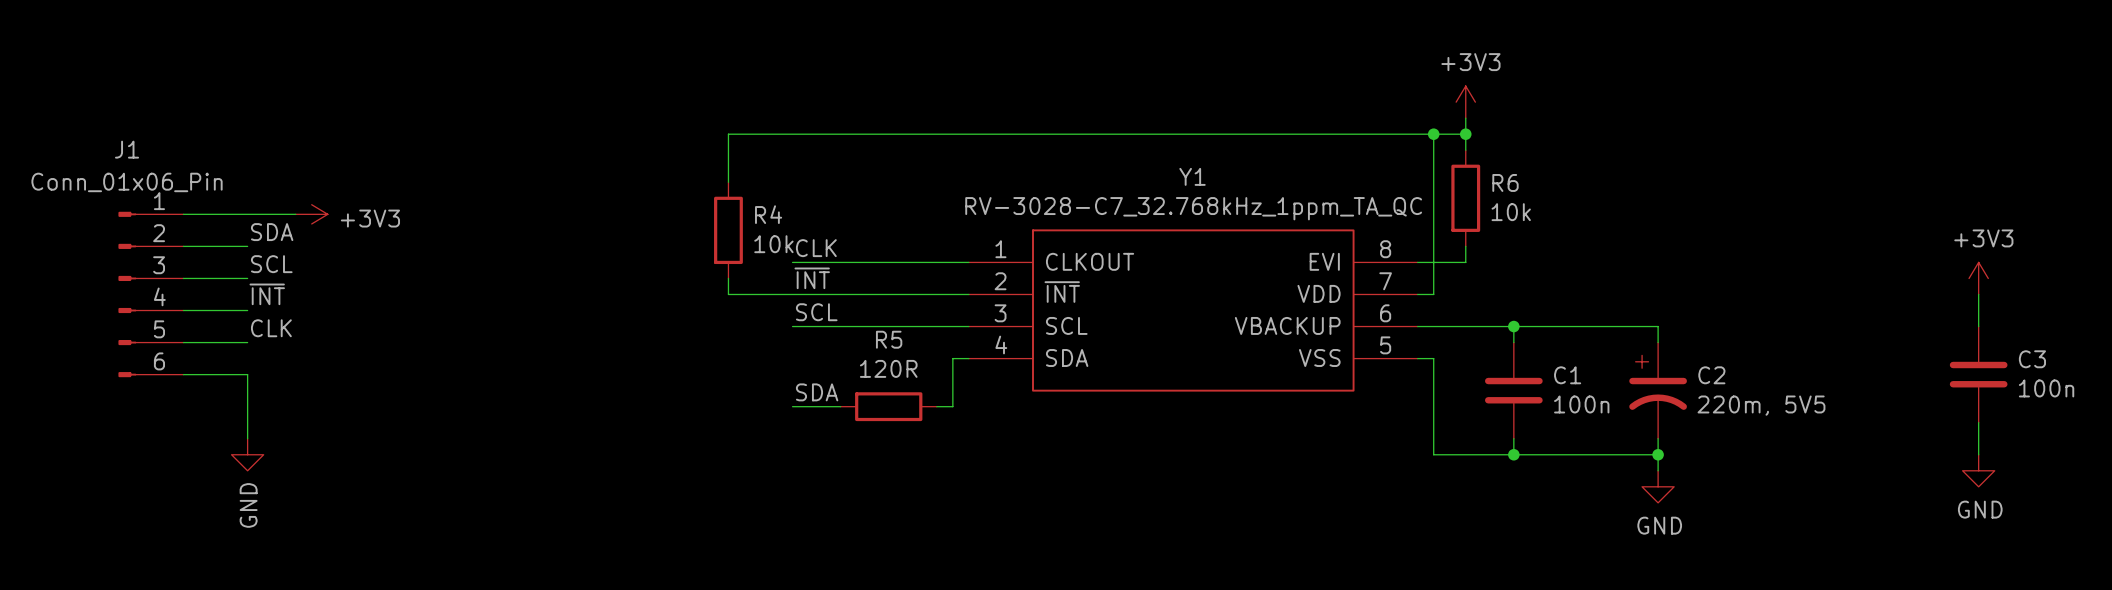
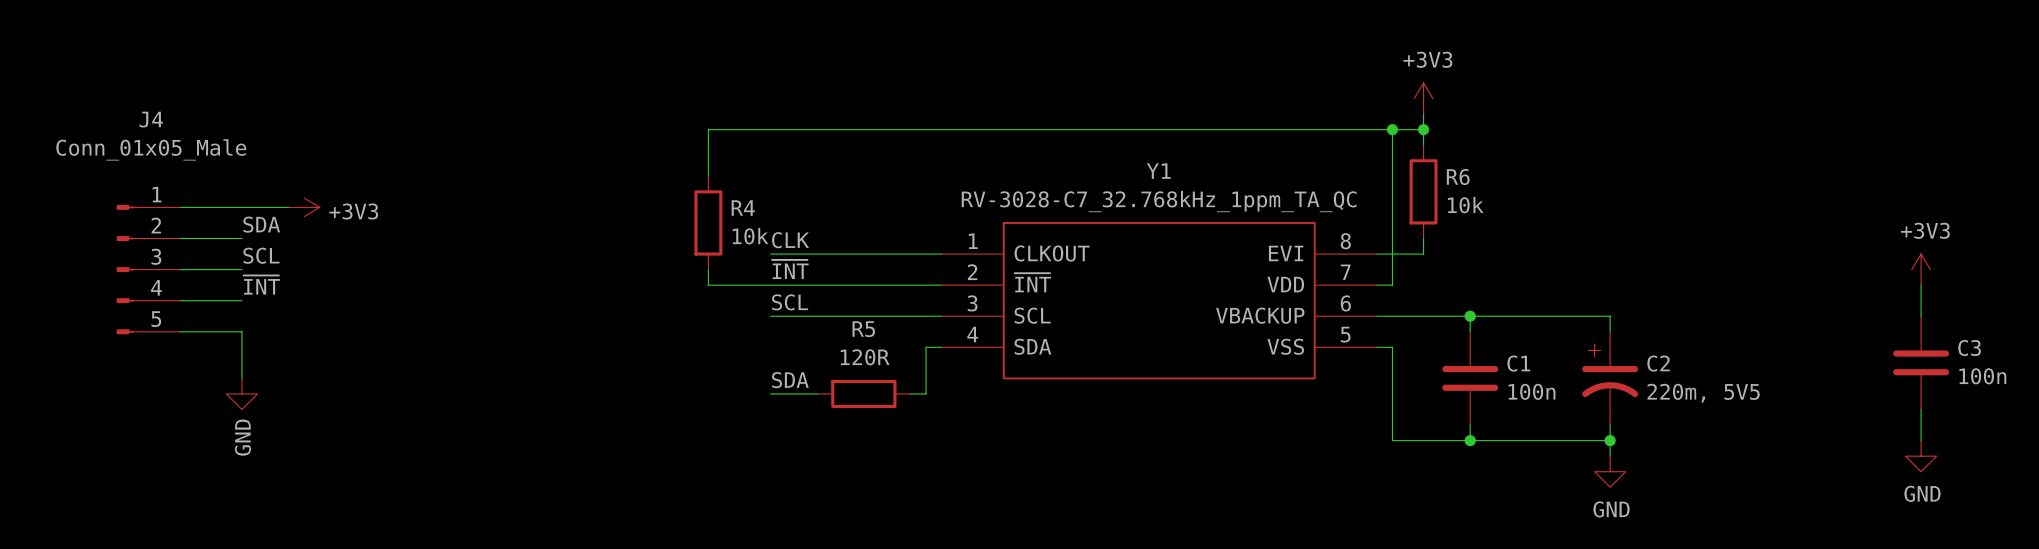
J4: none -> Conn_01x05_Male (148, 269)
J1: Conn_01x06_Pin (150, 294) -> none
label: CLK (271, 328) -> none
wire: (183, 374) (247, 374) -> (241, 331) (241, 362)
wire: (247, 390) (247, 438) -> none
power symbol position: GND (247, 454) -> GND (241, 393)

